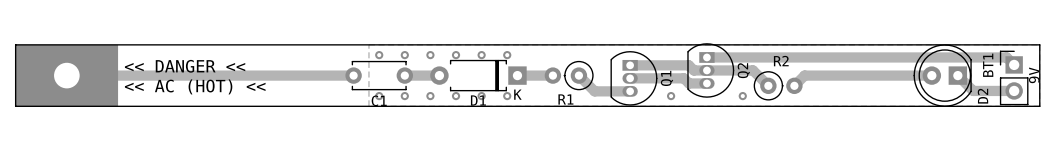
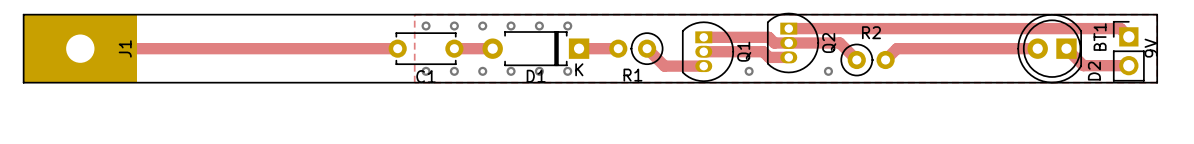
text: << DANGER << (185, 66) -> none
J1 name: none -> J1 (125, 48)
text: << AC (HOT) << (195, 86) -> none

